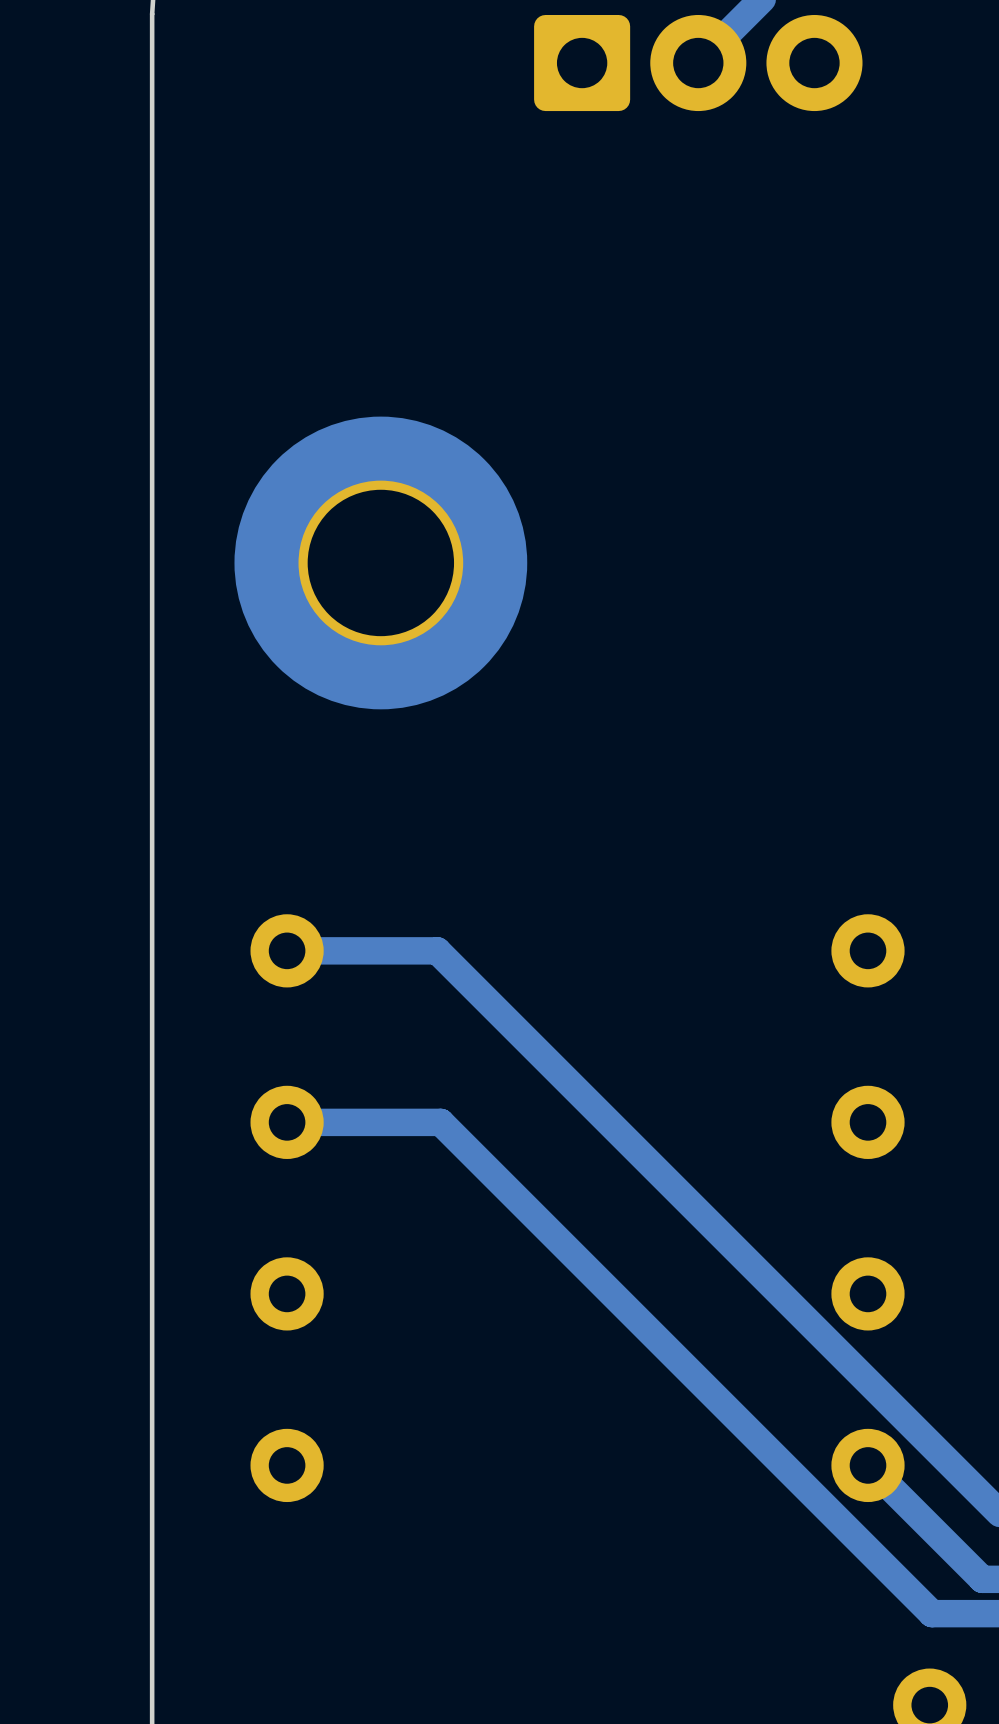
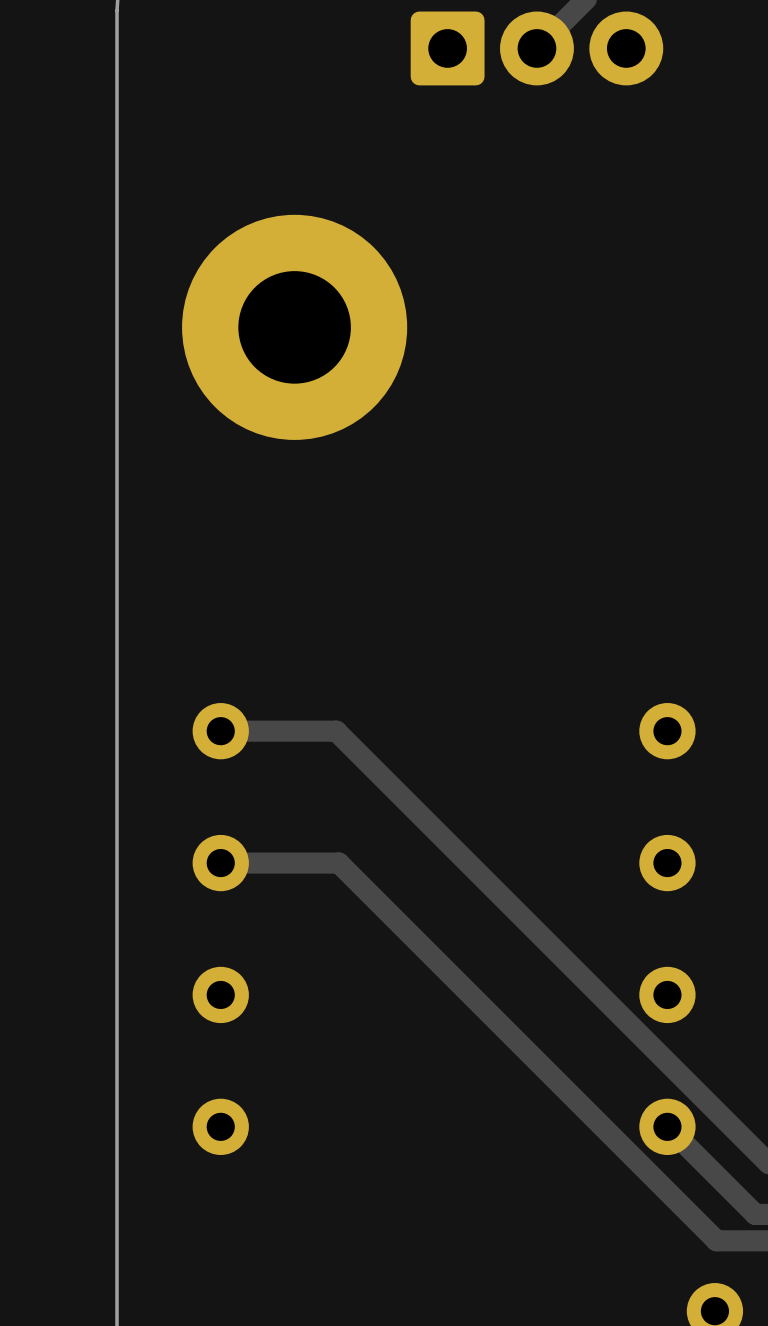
part position: (380, 562) -> (294, 327)

